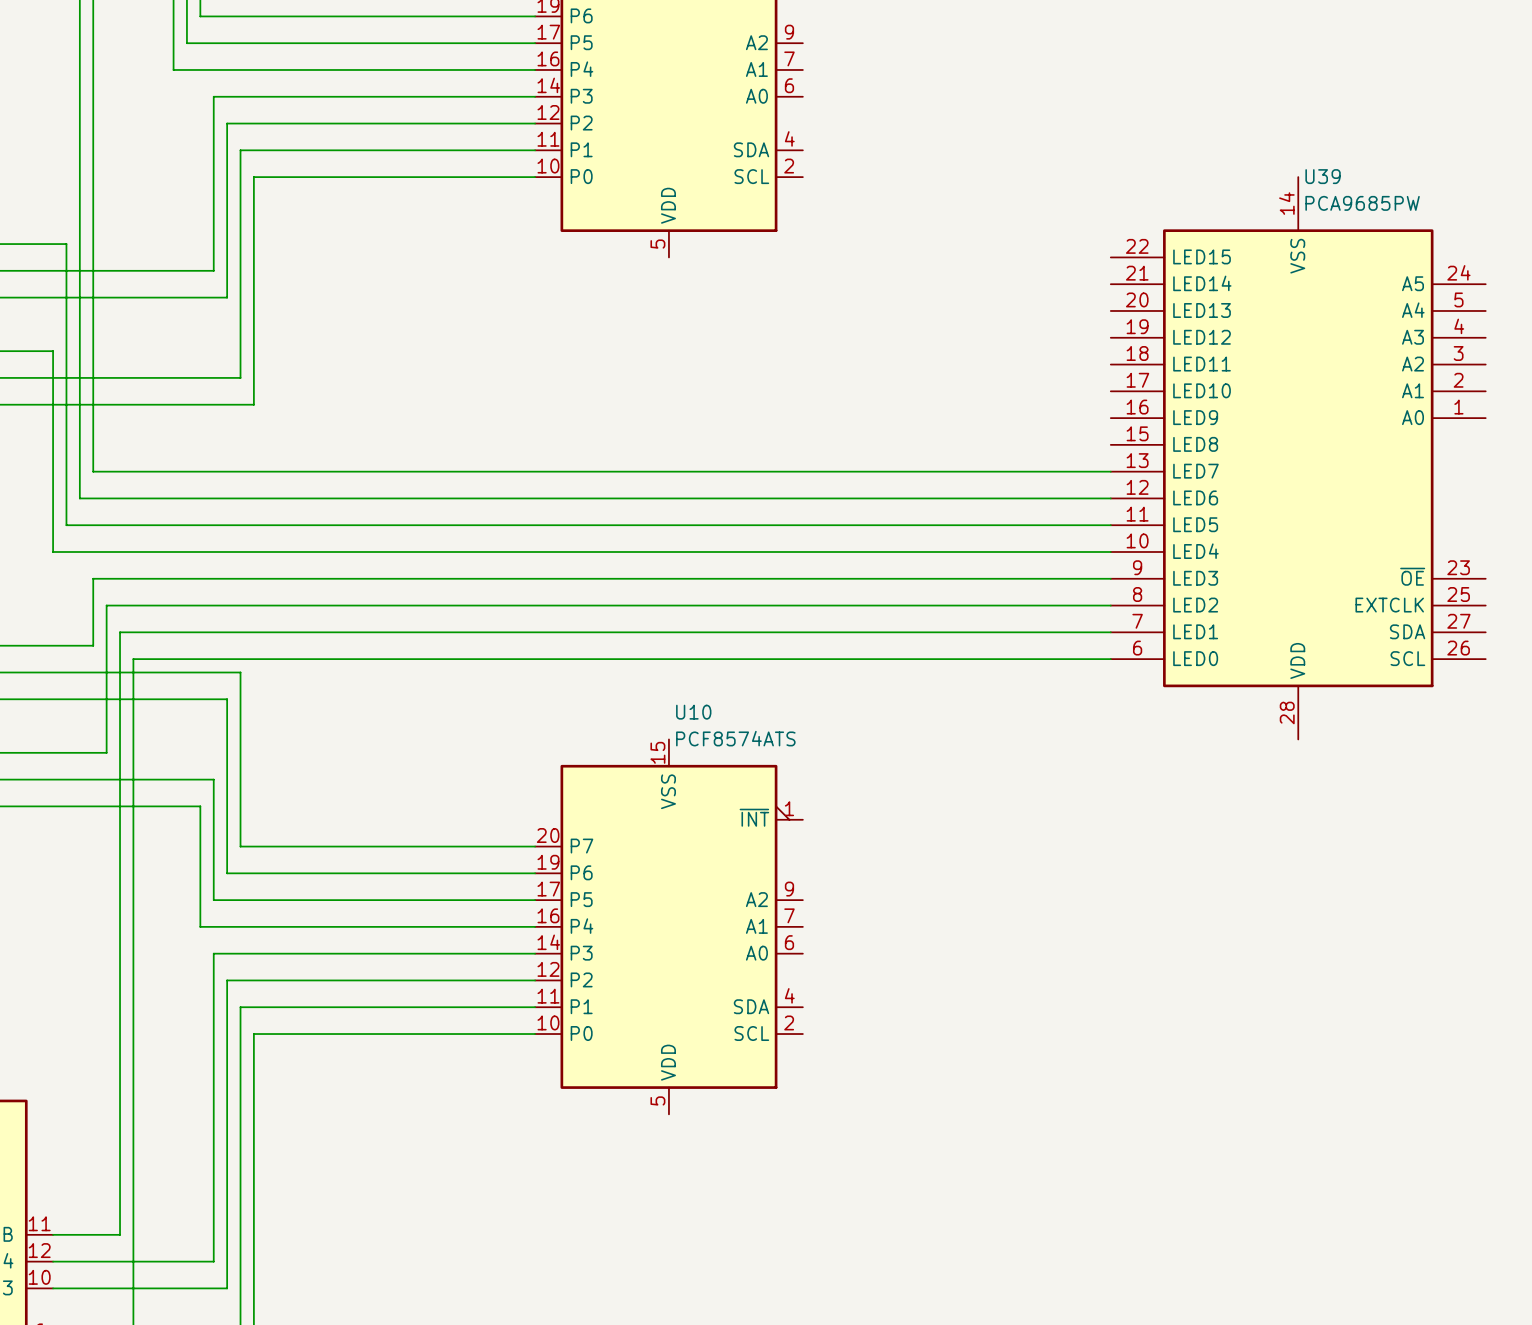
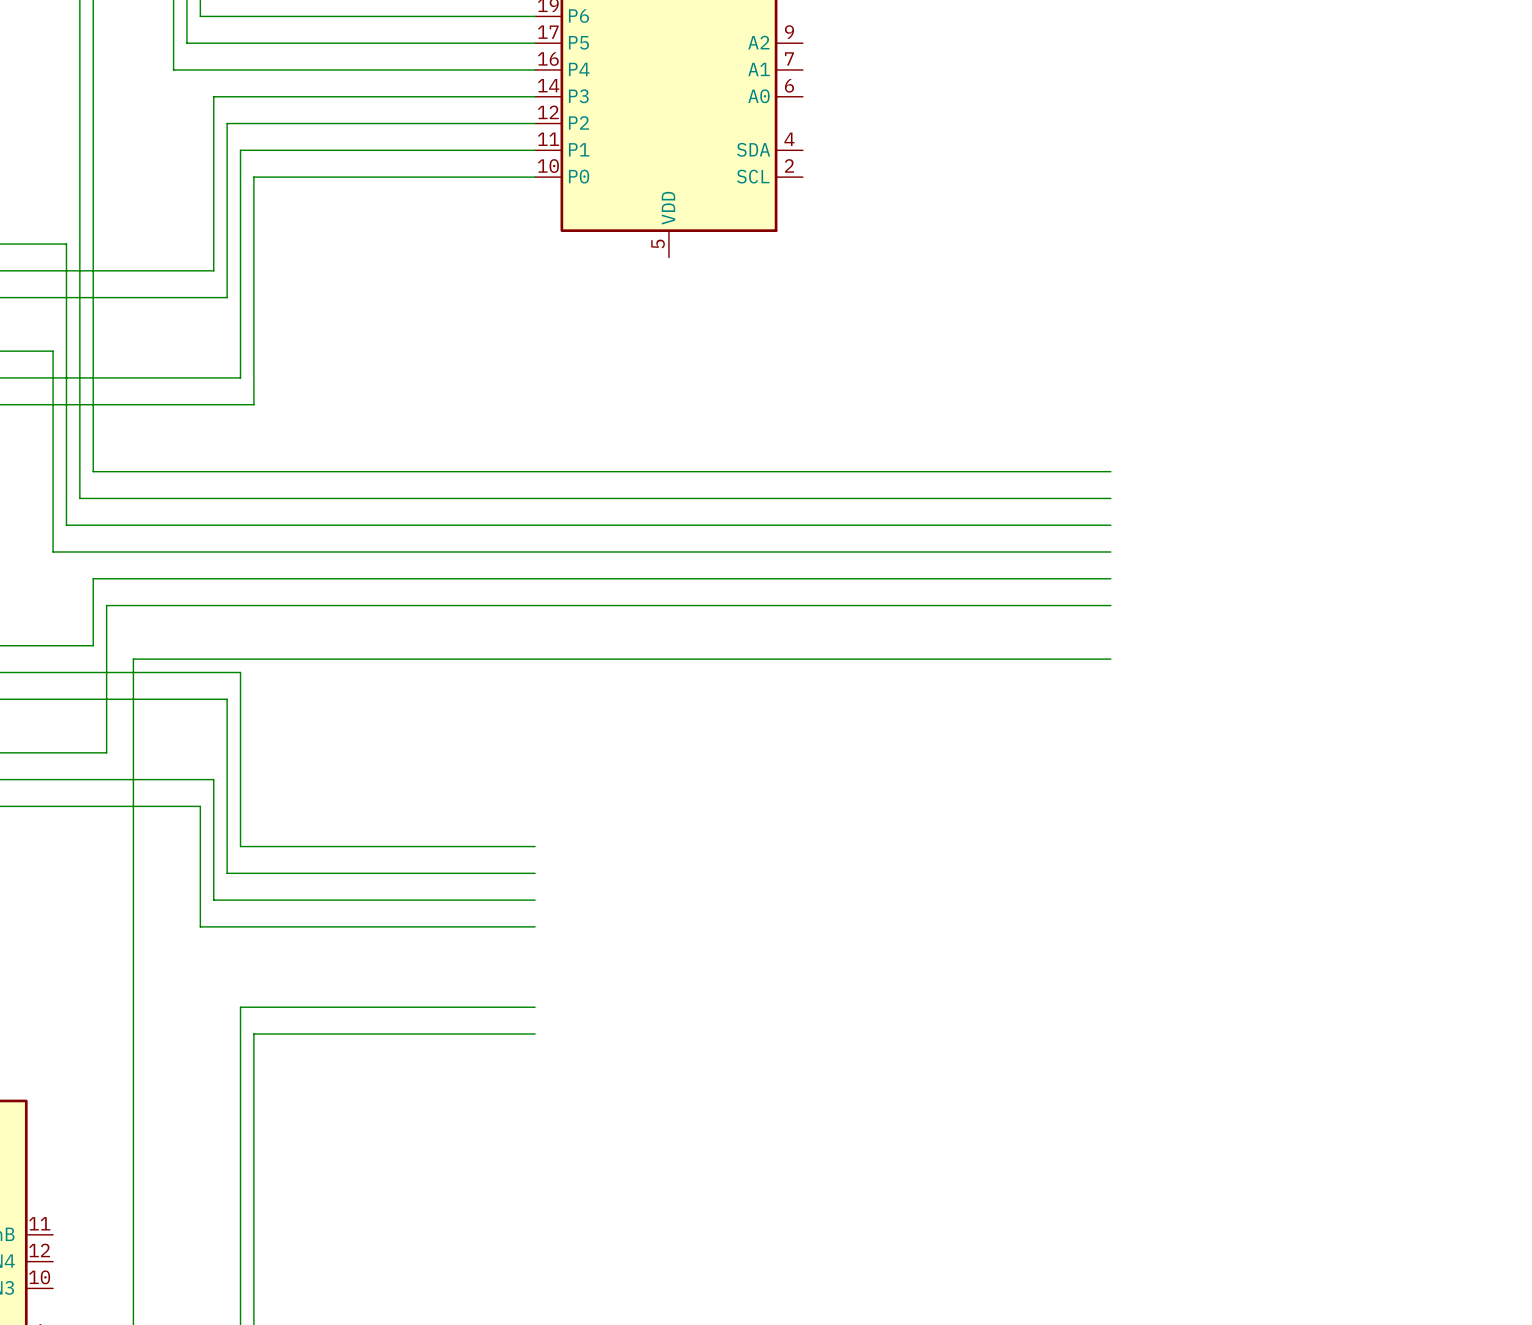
U39: PCA9685PW (1298, 458) -> none
wire: (1110, 632) (120, 632) (120, 1234) (53, 1234) -> none
U10: PCF8574ATS (668, 926) -> none
wire: (535, 953) (213, 953) (213, 1261) (53, 1261) -> none
wire: (535, 980) (227, 980) (227, 1288) (53, 1288) -> none

